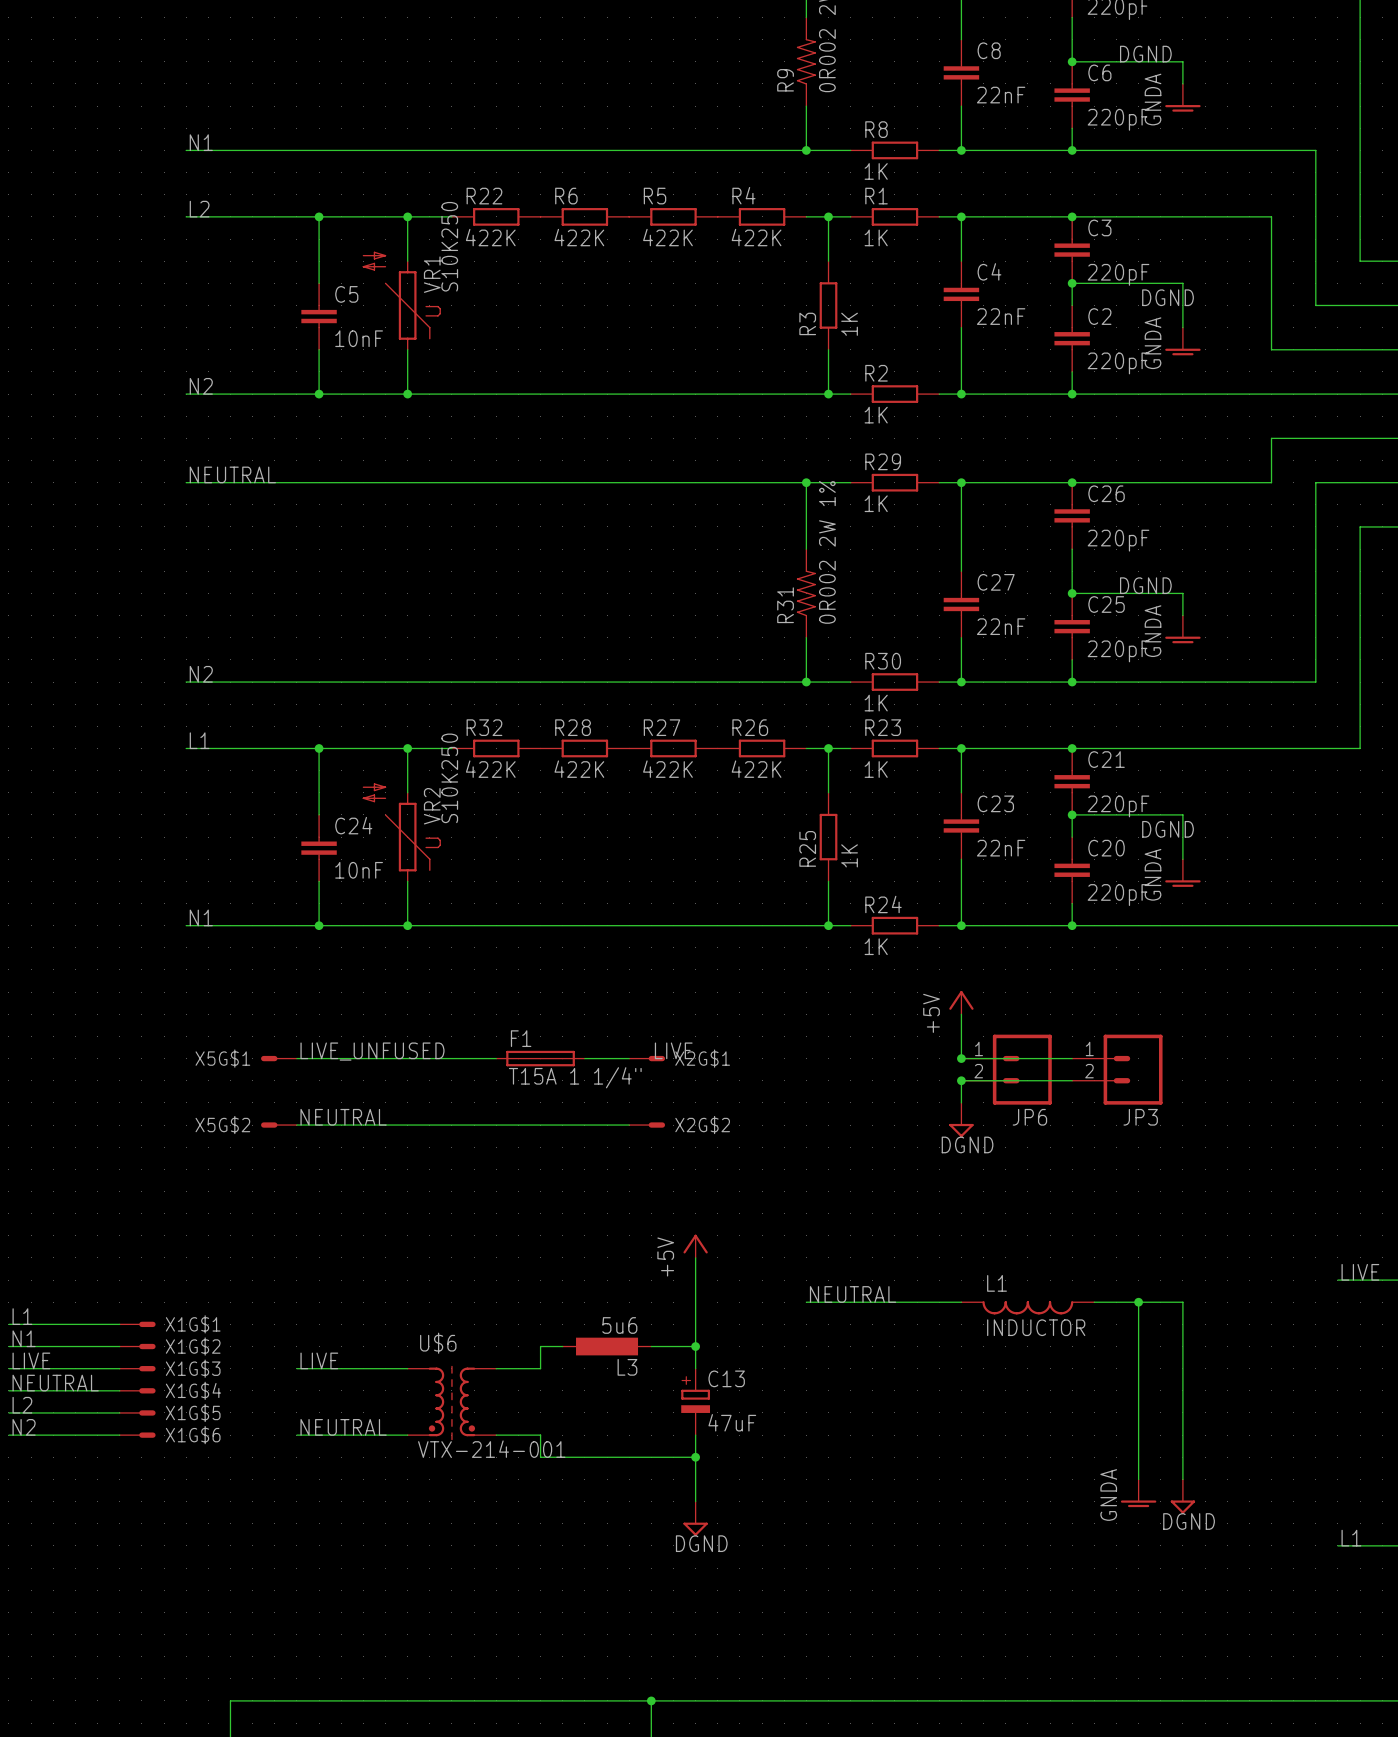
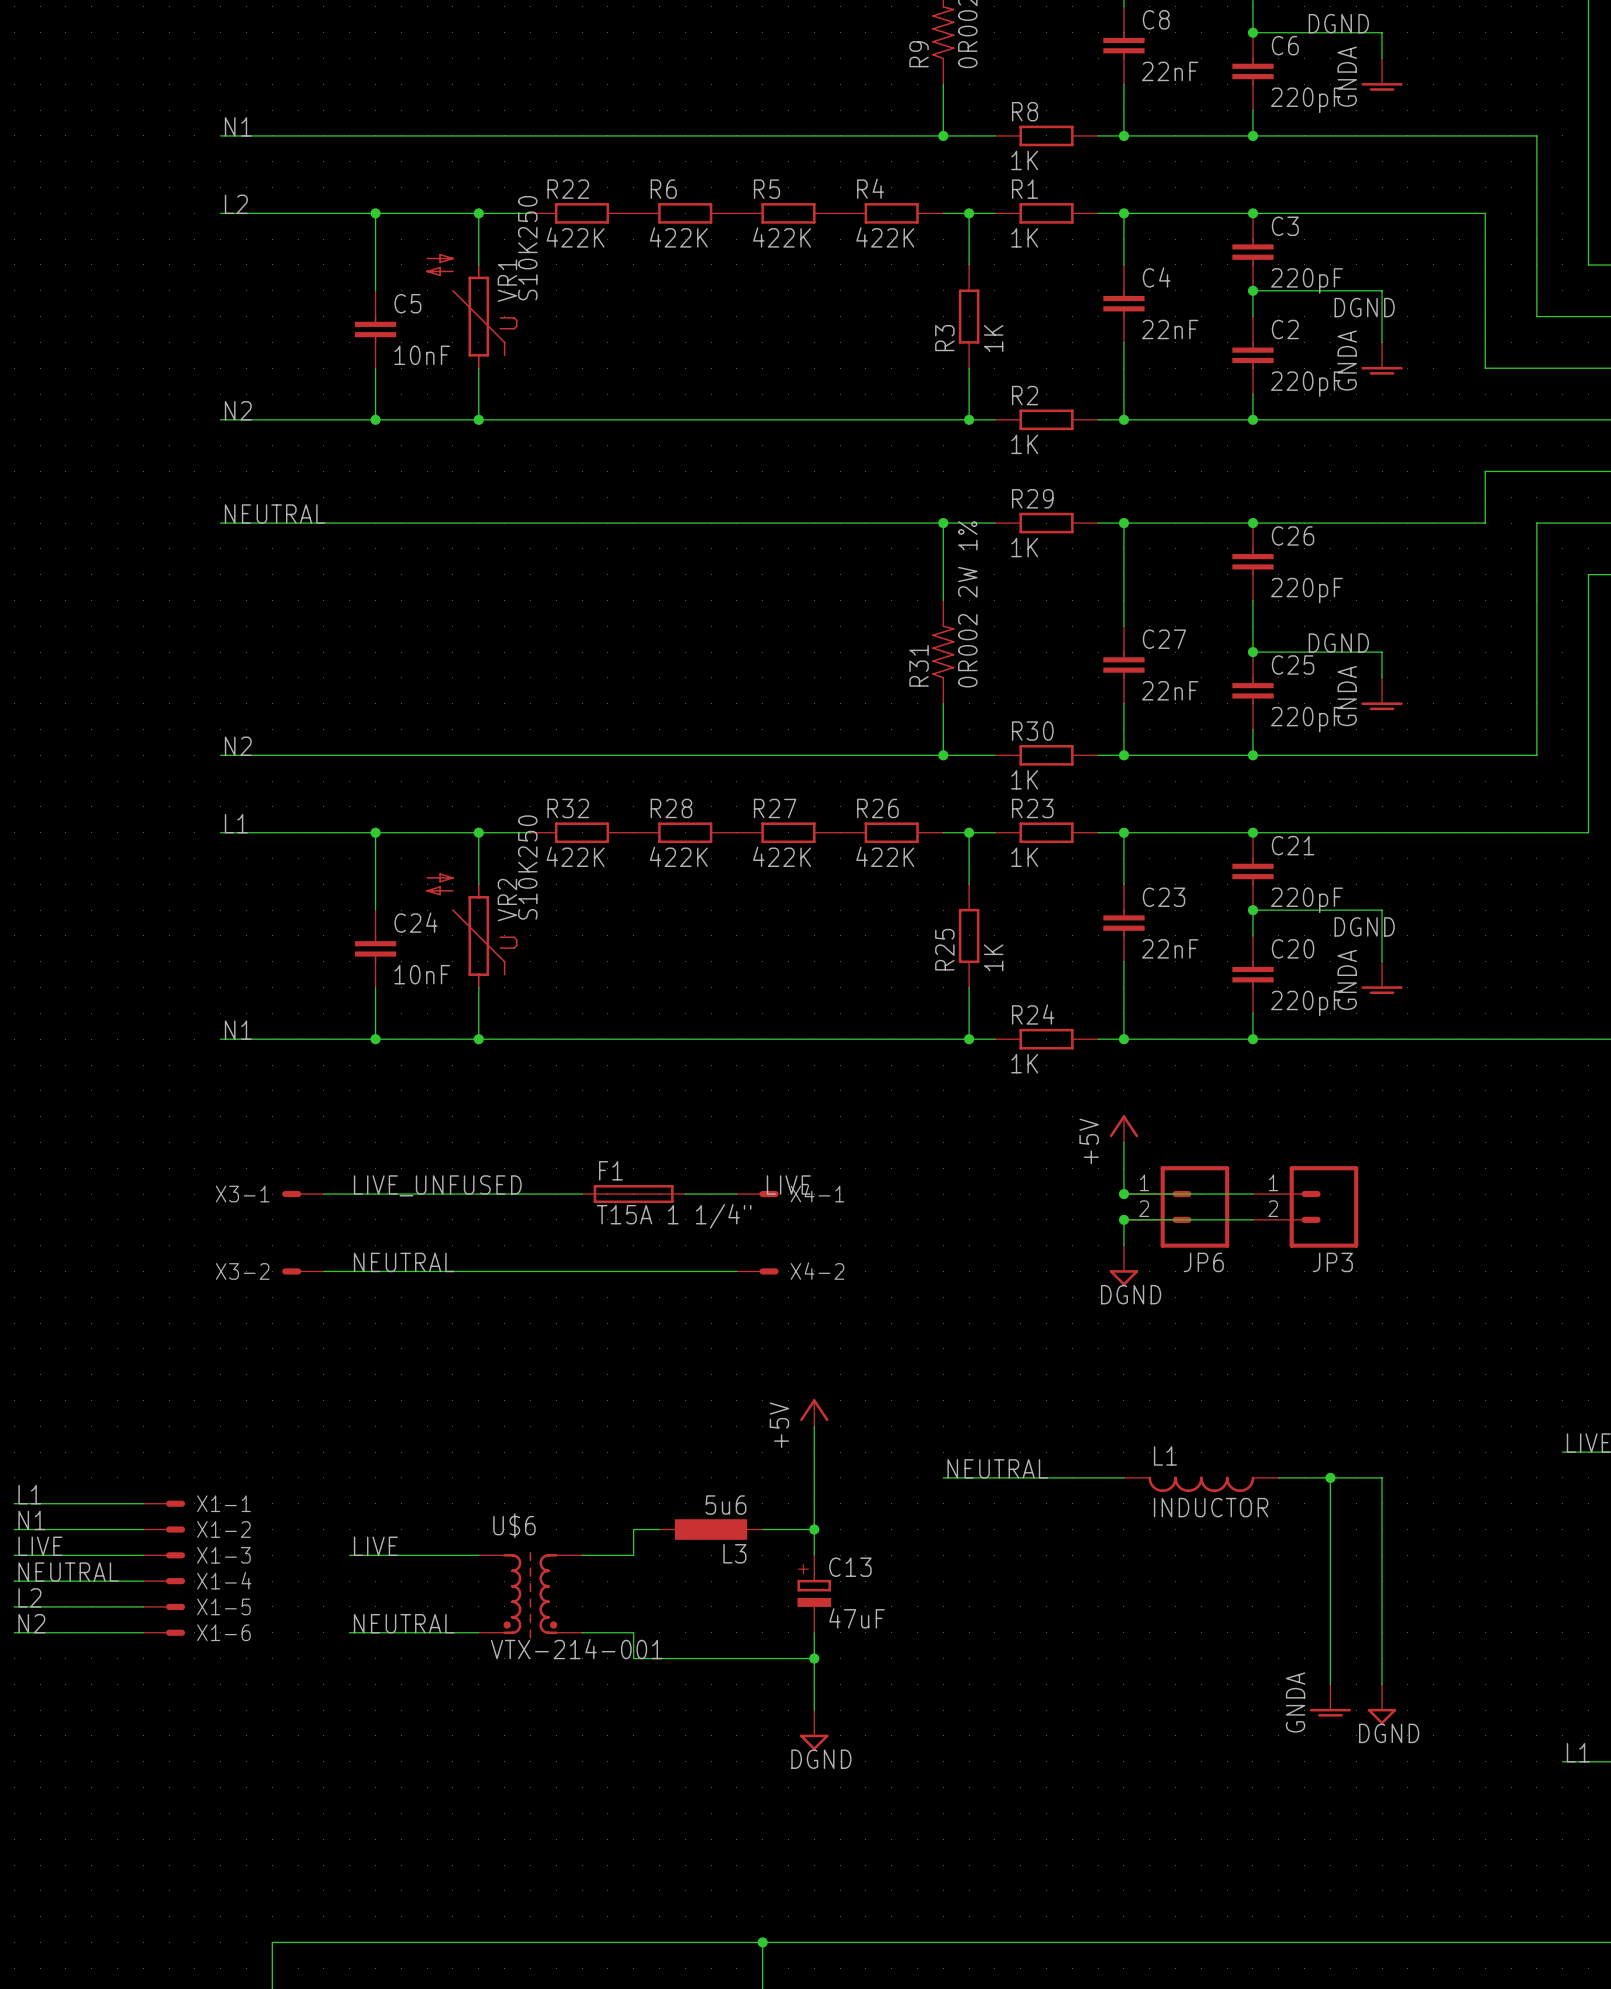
X3-1: none -> (303, 1194)
X5G$1: (278, 1058) -> none
X2G$1 name: X2G$1 (702, 1058) -> X4-1 (817, 1193)
X3-2: none -> (303, 1271)
X5G$2: (278, 1125) -> none
X2G$2 name: X2G$2 (702, 1125) -> X4-2 (817, 1271)
X1G$1 name: X1G$1 (193, 1324) -> X1-1 (223, 1503)
X1G$2 name: X1G$2 (193, 1346) -> X1-2 (223, 1529)
X1G$3 name: X1G$3 (193, 1368) -> X1-3 (223, 1555)
X1G$4 name: X1G$4 (193, 1390) -> X1-4 (224, 1580)
X1G$5 name: X1G$5 (193, 1412) -> X1-5 (223, 1606)
X1G$6 name: X1G$6 (193, 1435) -> X1-6 (223, 1632)

